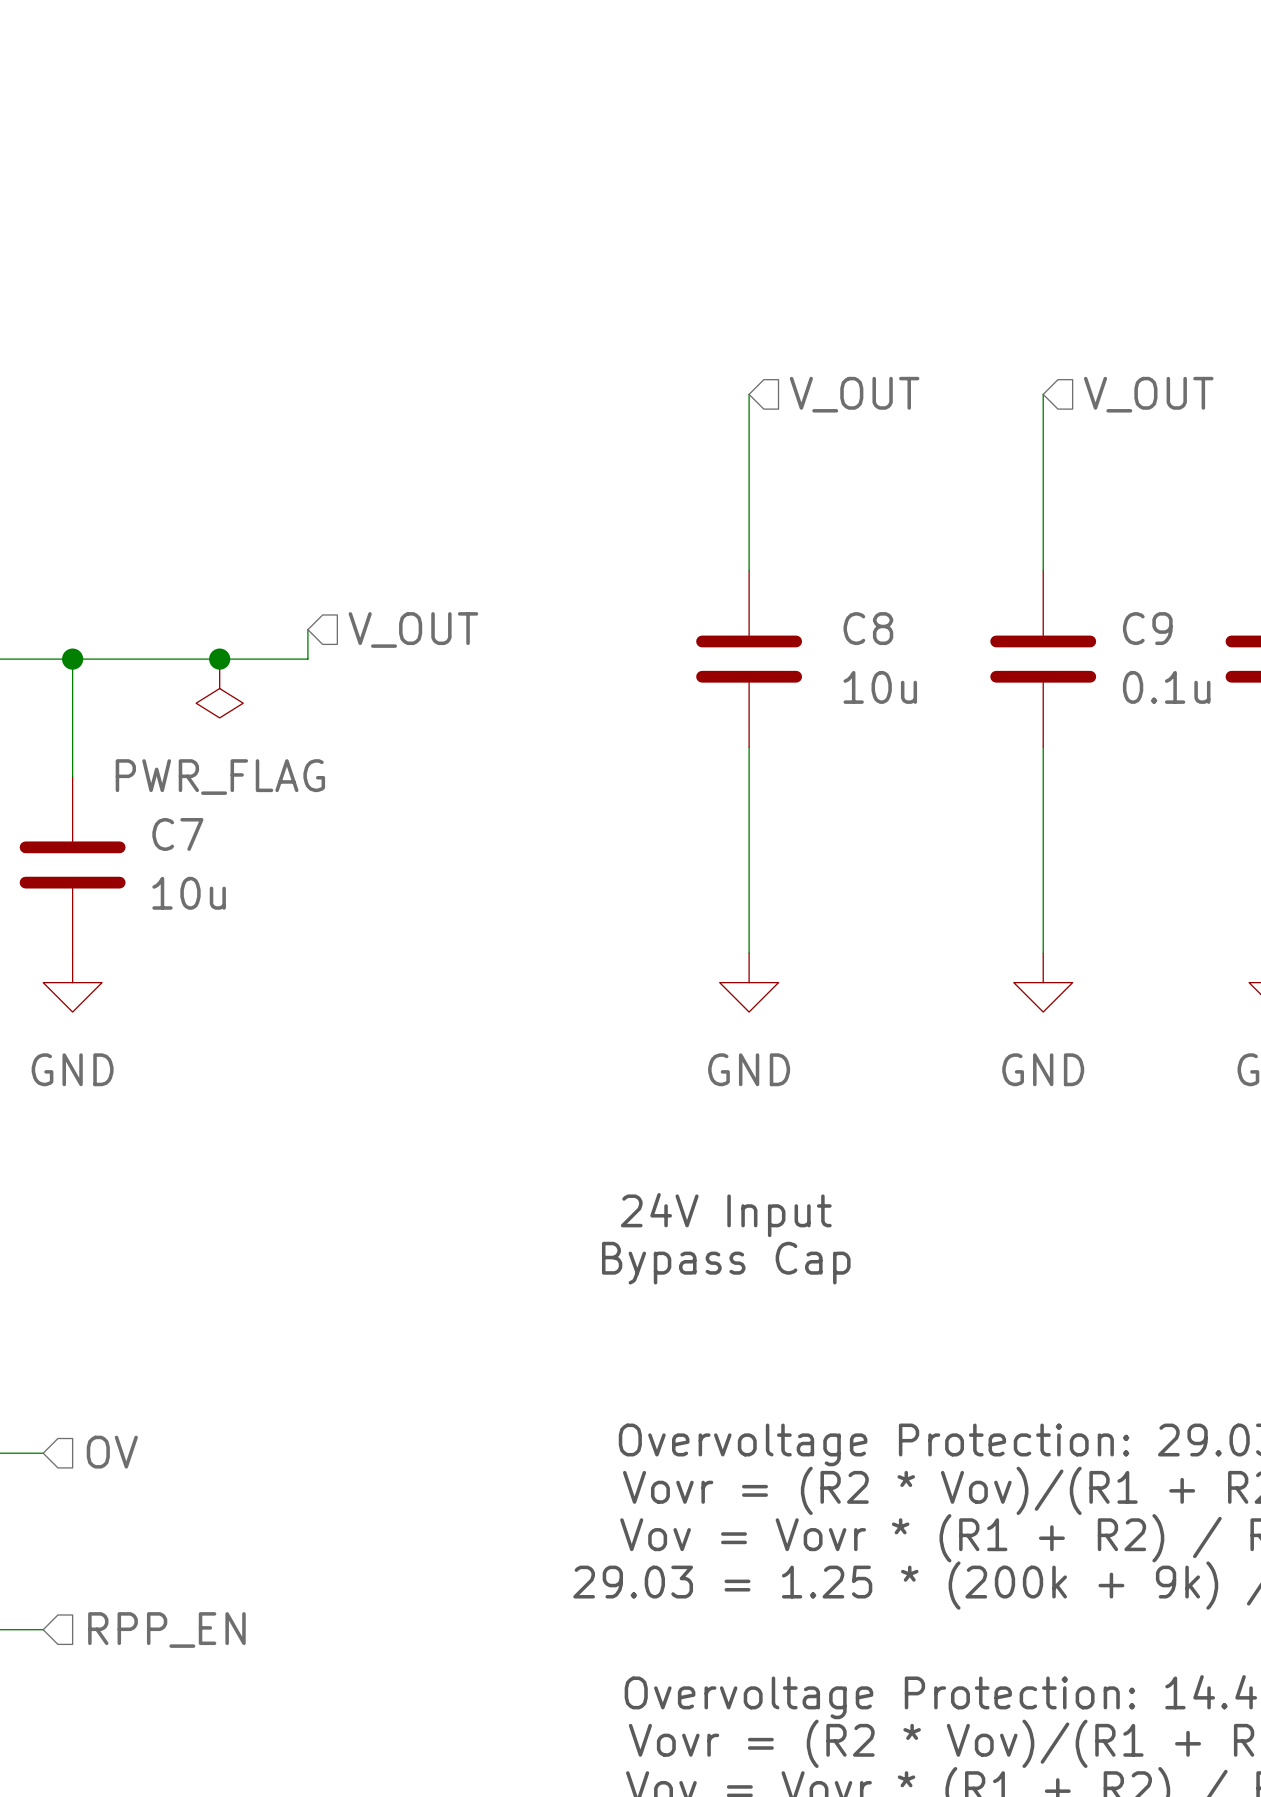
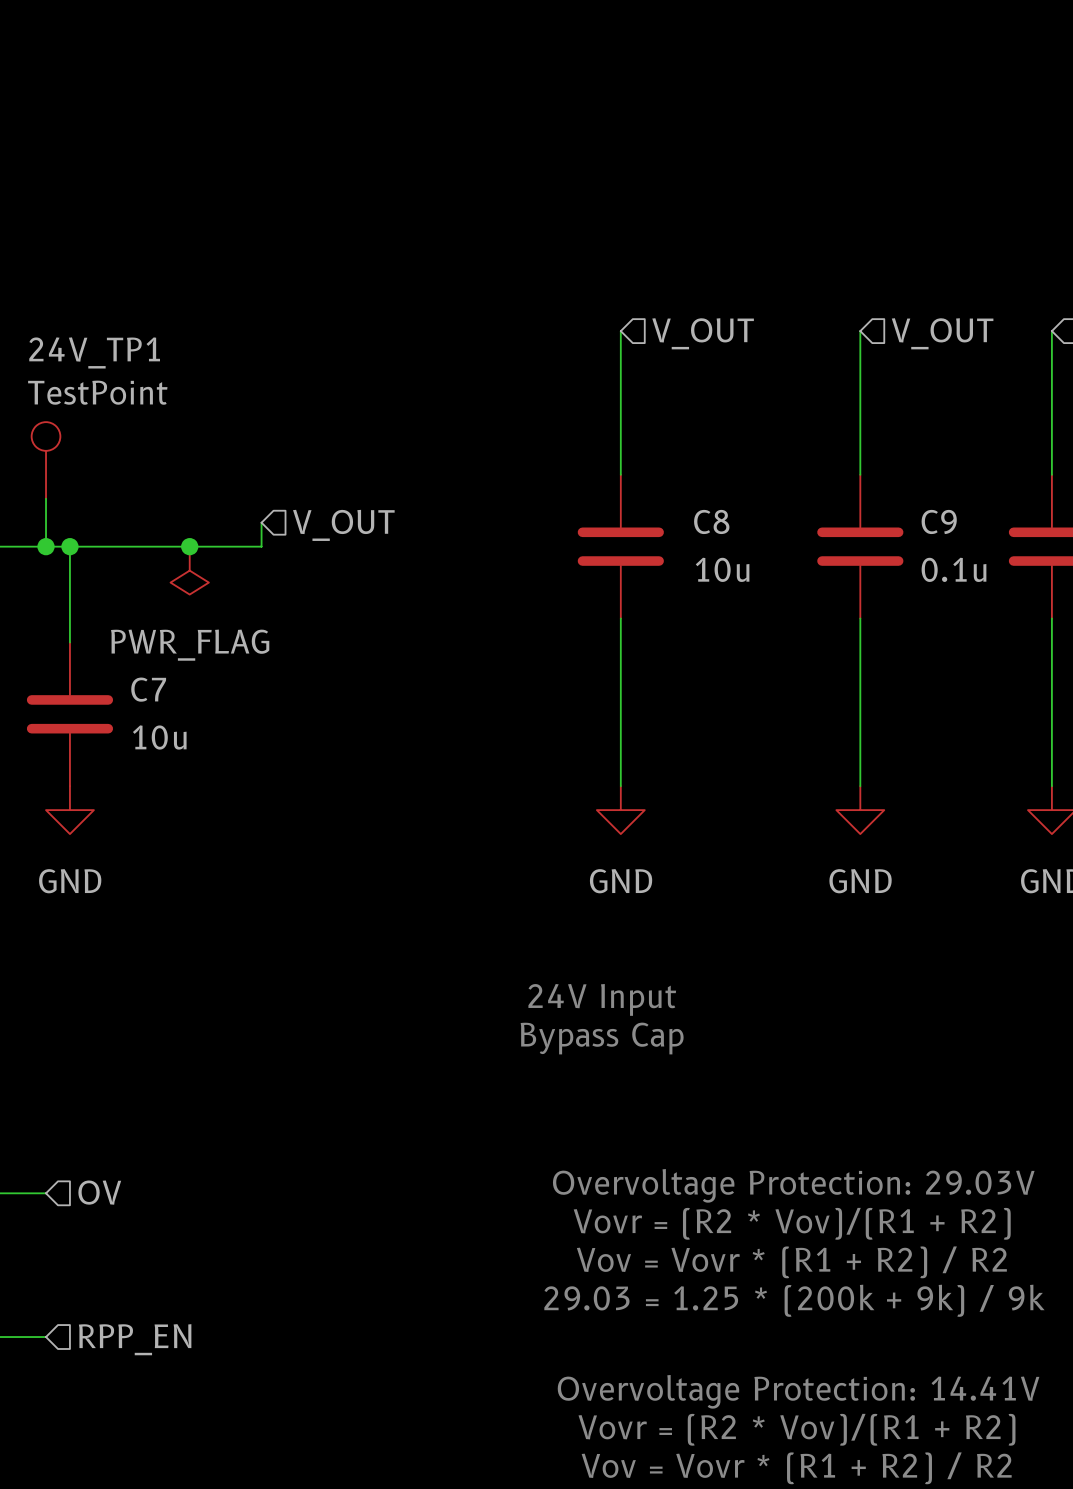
24V_TP1: none -> TestPoint (46, 460)
wire: none -> (46, 498) (46, 546)
junction: none -> (46, 546)

